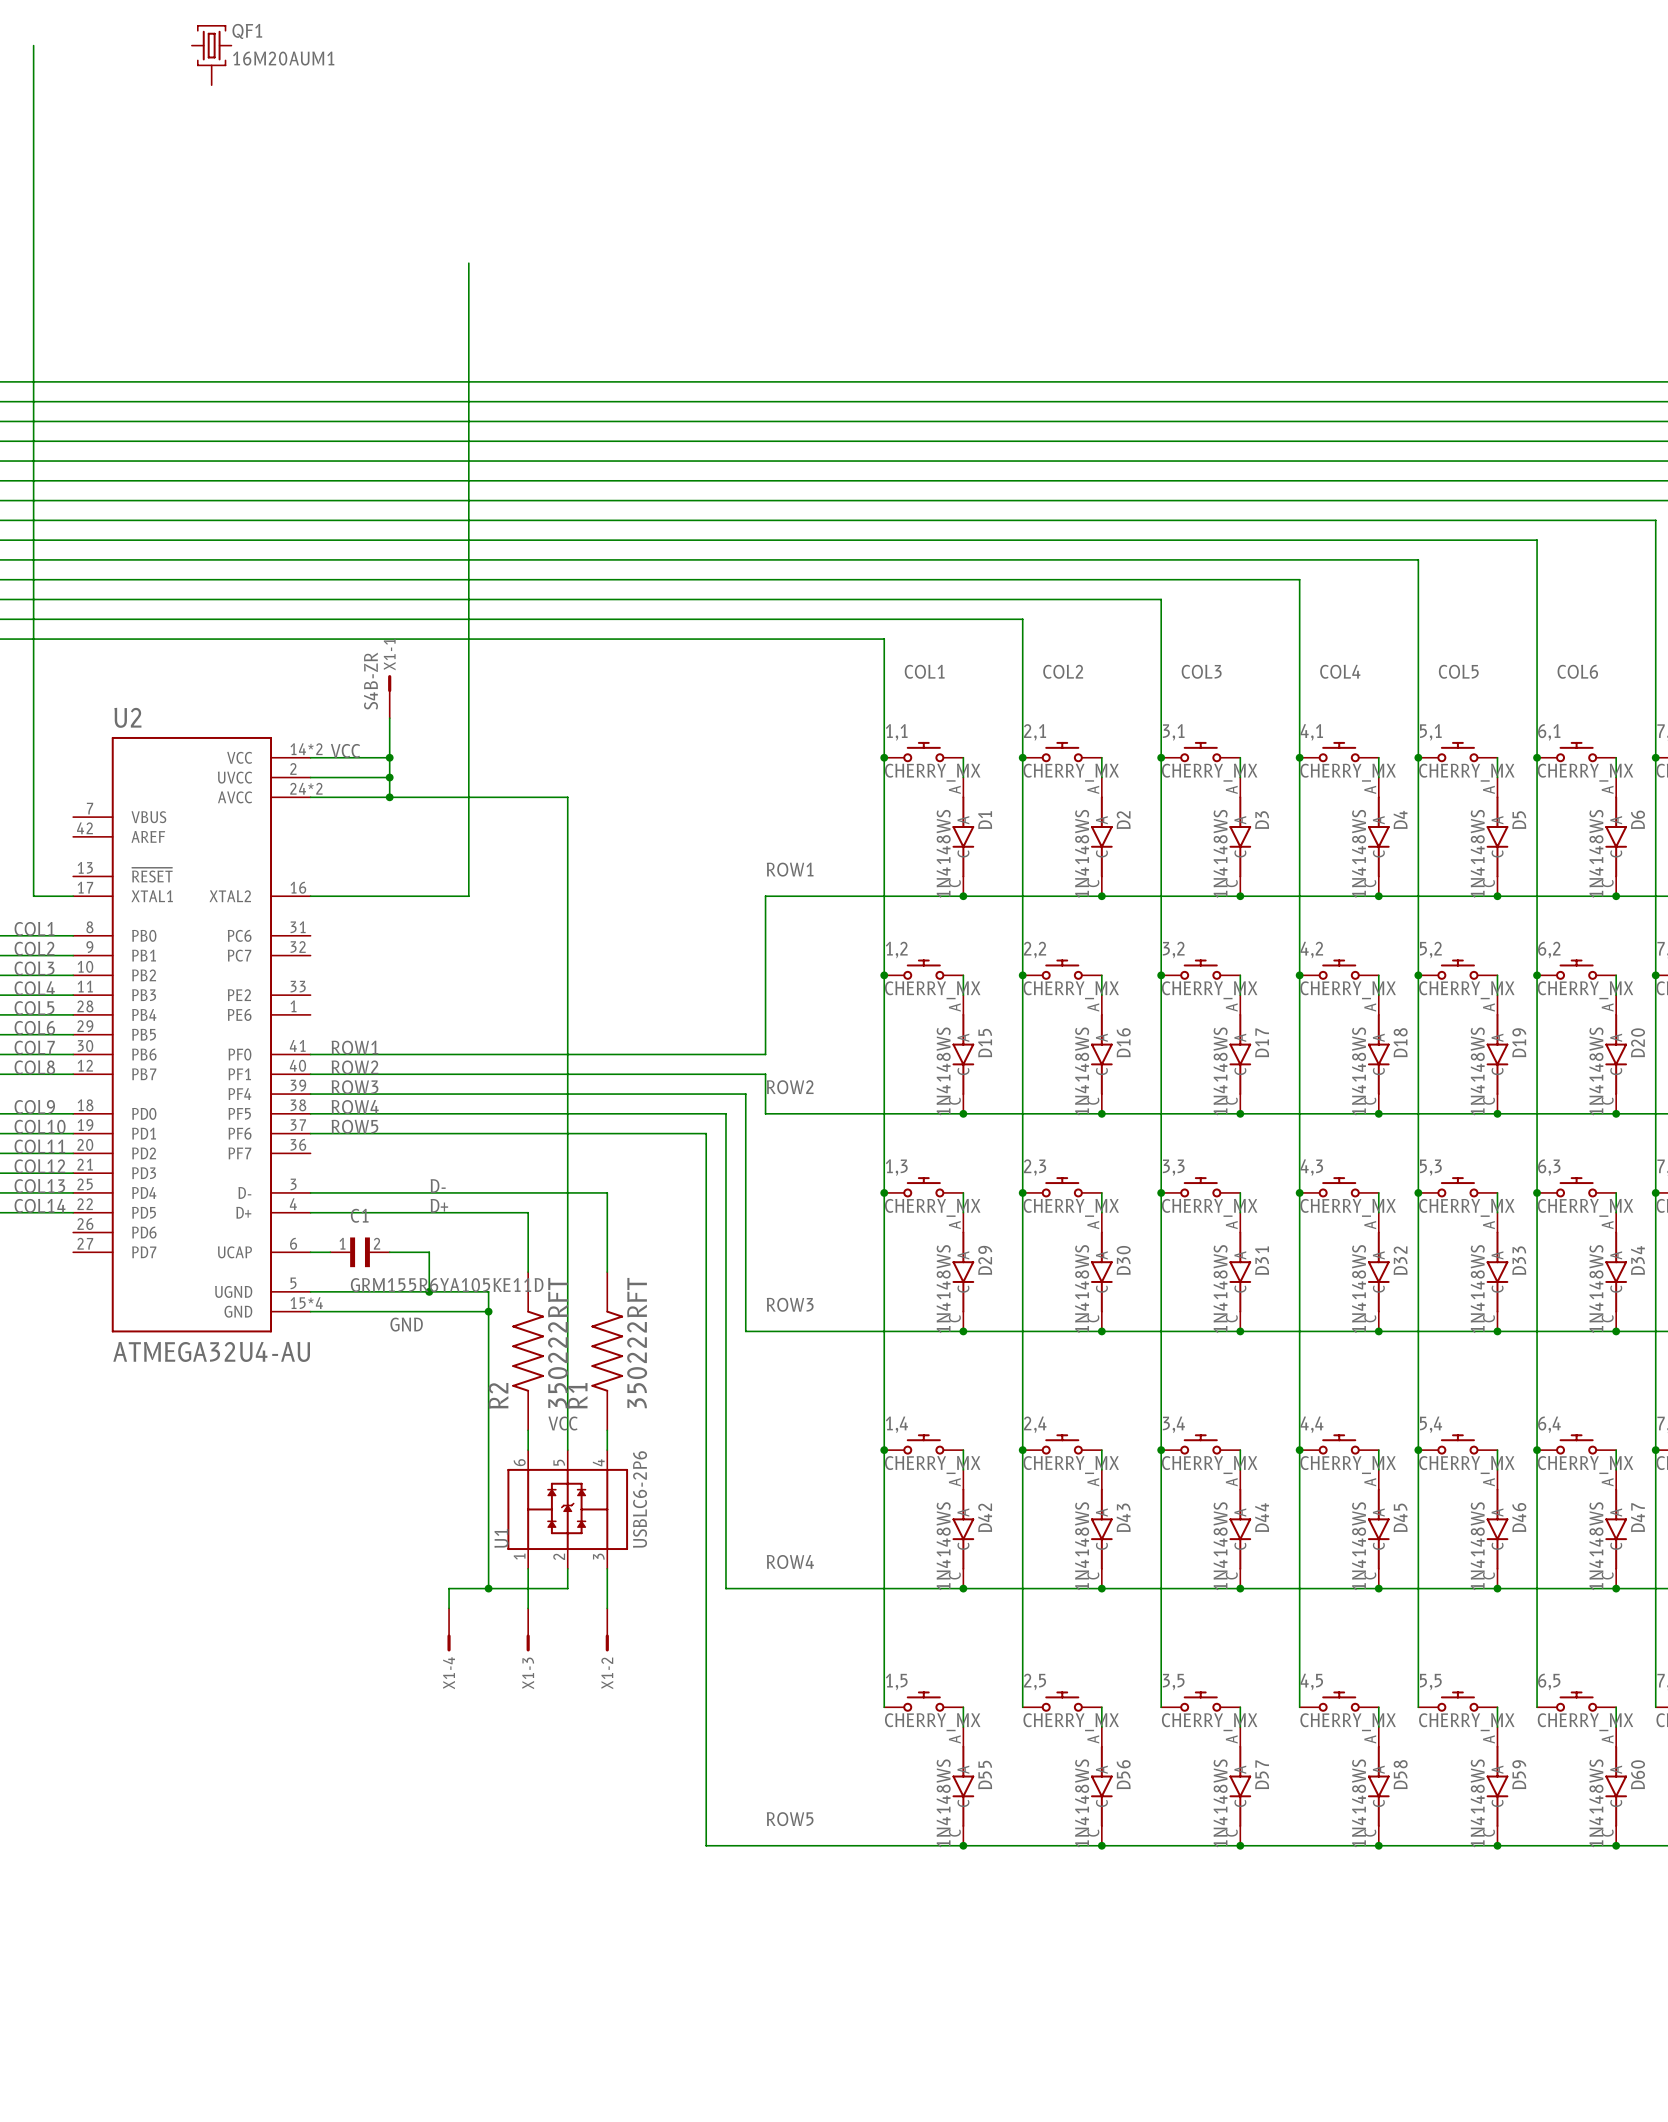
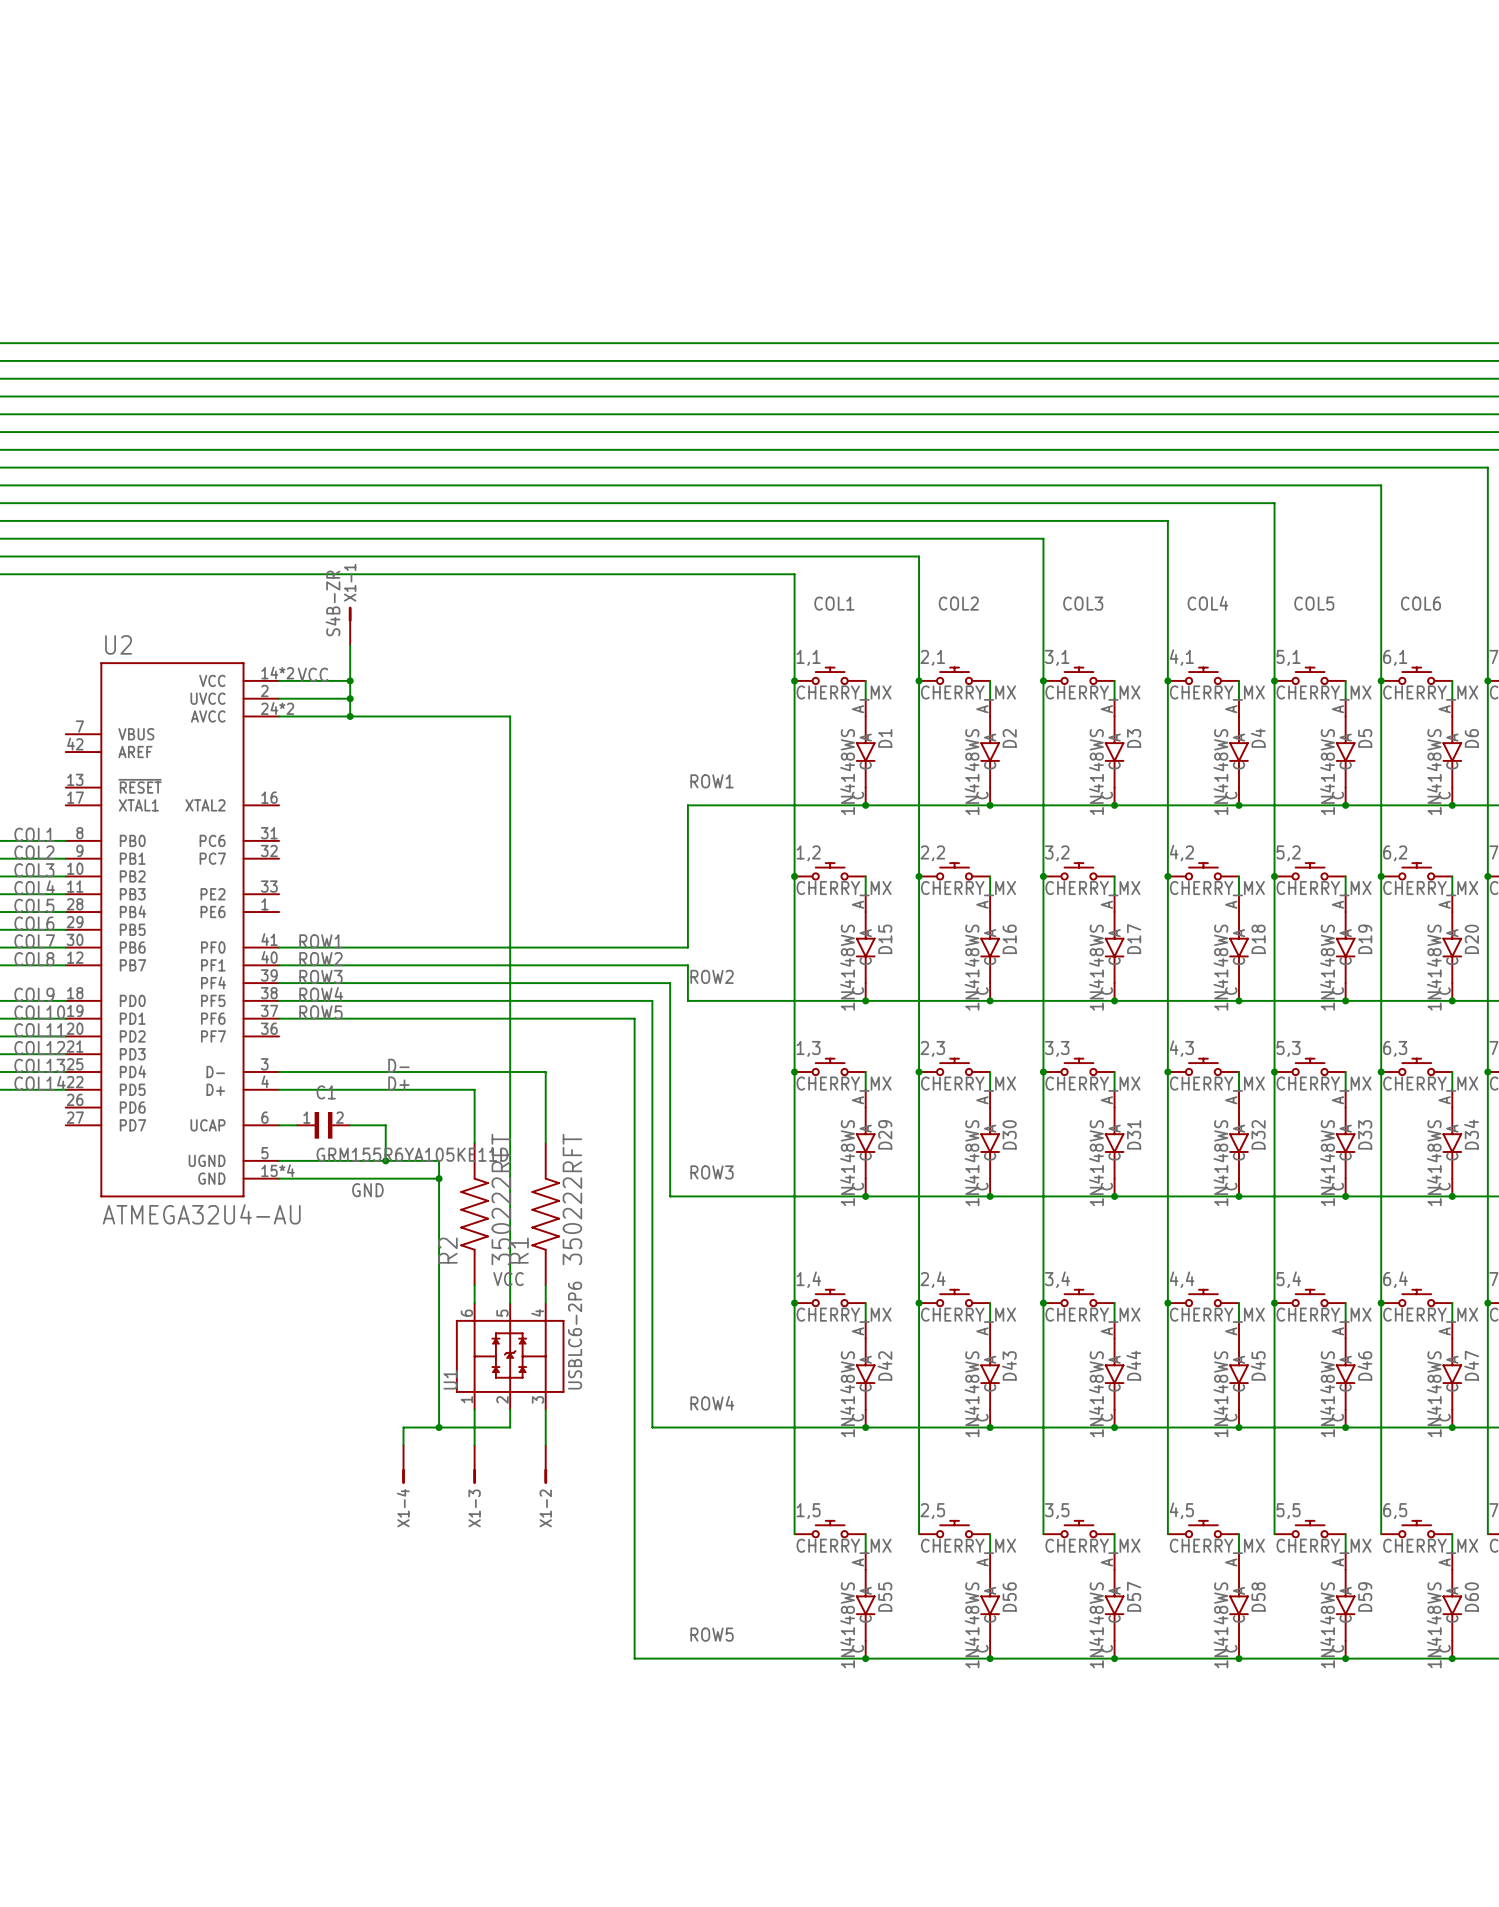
wire: (33, 45) (33, 896) (73, 896) -> none
QF1: 16M20AUM1 (211, 55) -> none
wire: (468, 263) (468, 896) (310, 896) -> none

